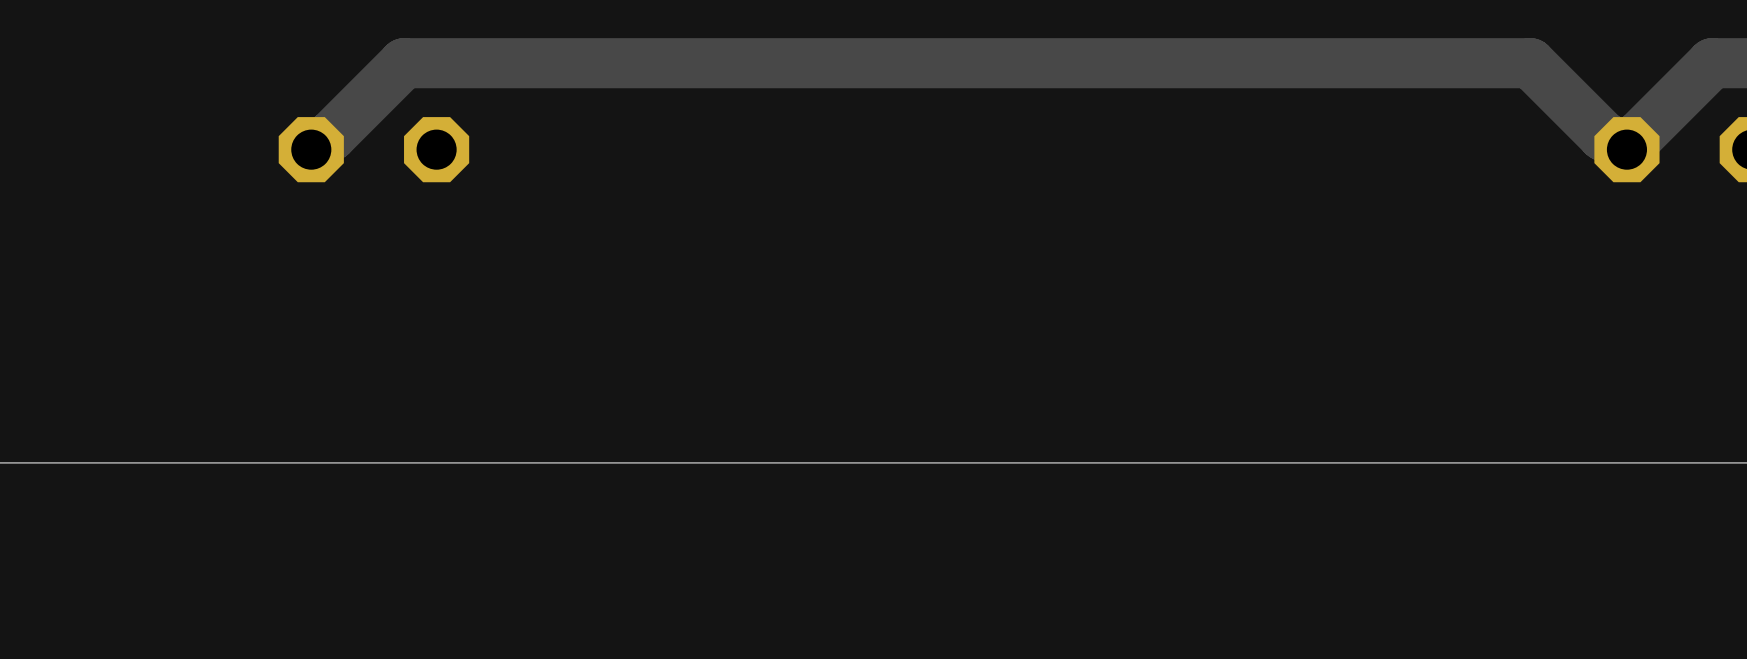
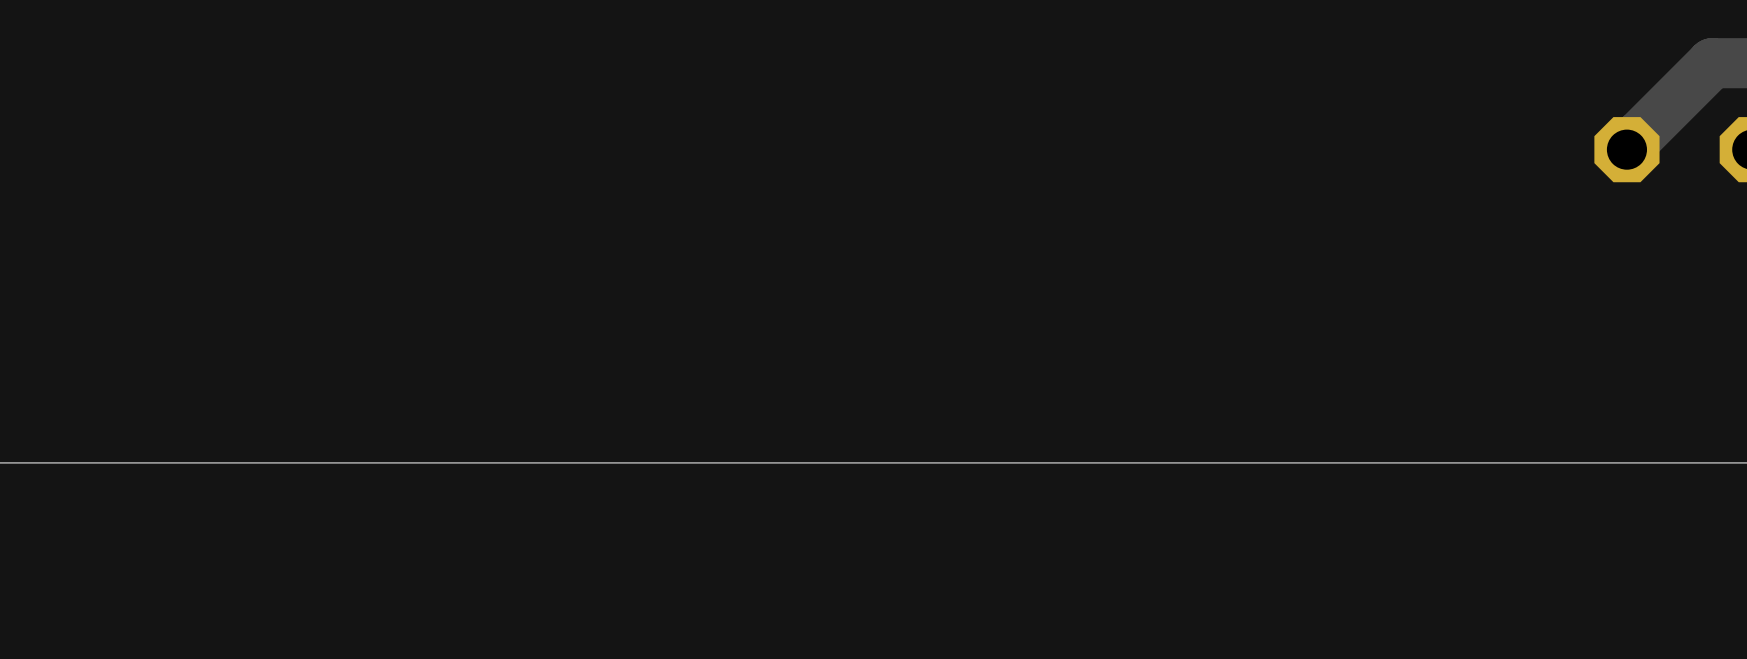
part: (373, 149) -> none
track: (1626, 149) (1603, 135) (1530, 63) (404, 63) (331, 135) (311, 149) -> none

